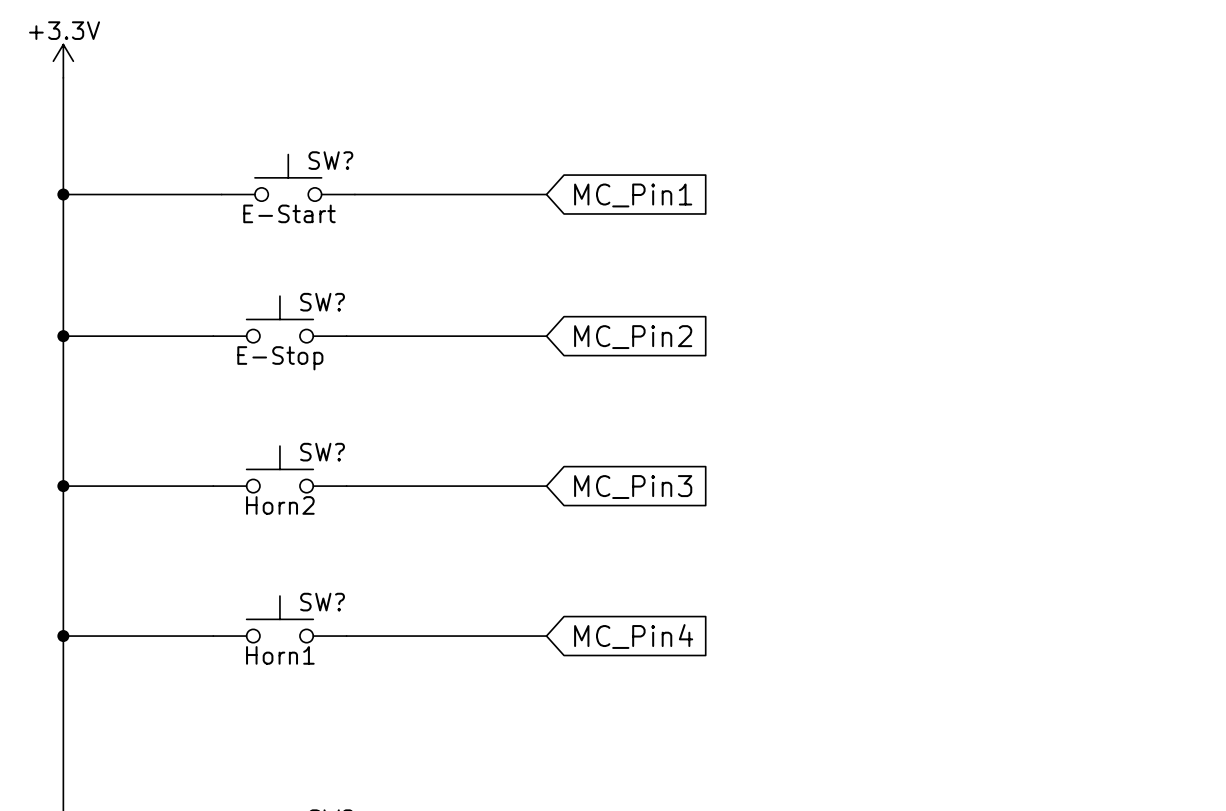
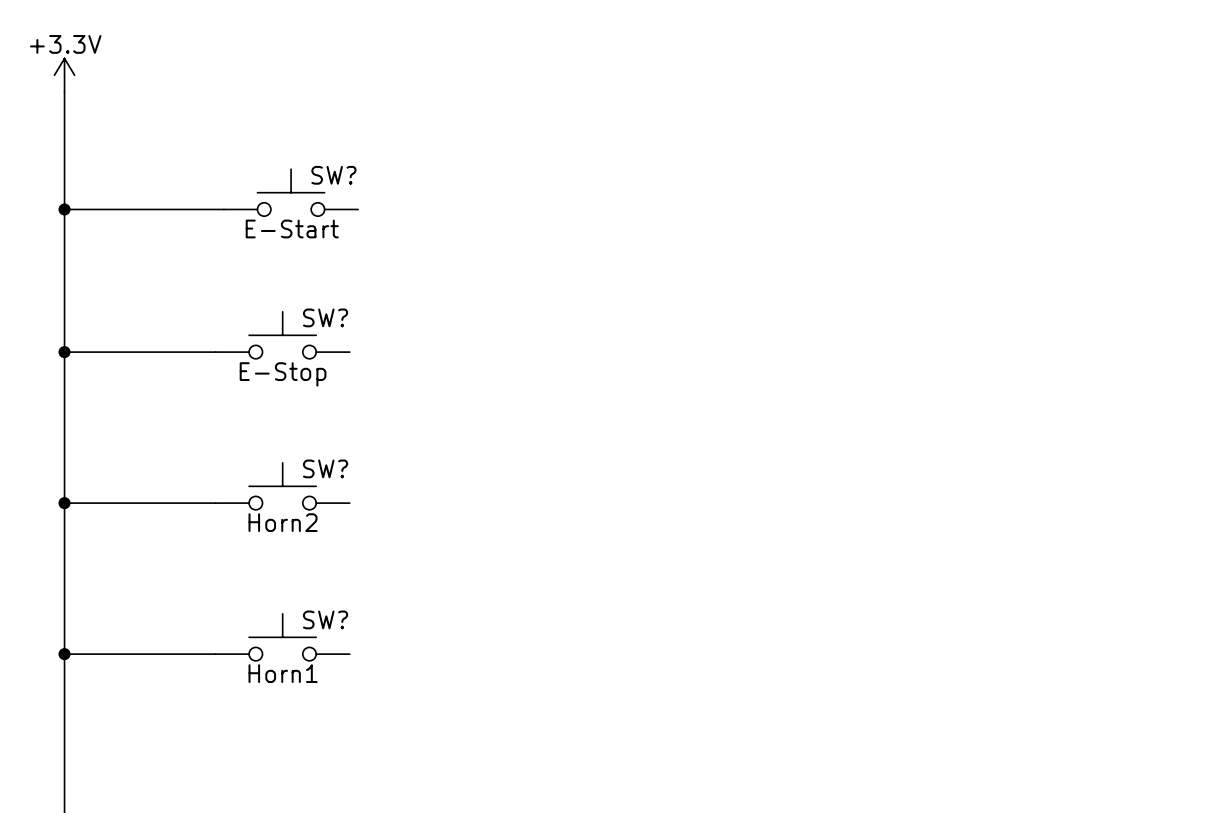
wire: (354, 194) (546, 194) -> none
global label: MC_Pin1 (633, 195) -> none
wire: (346, 336) (546, 336) -> none
global label: MC_Pin2 (633, 337) -> none
wire: (346, 486) (546, 486) -> none
global label: MC_Pin3 (633, 487) -> none
wire: (346, 636) (546, 636) -> none
global label: MC_Pin4 (633, 636) -> none

